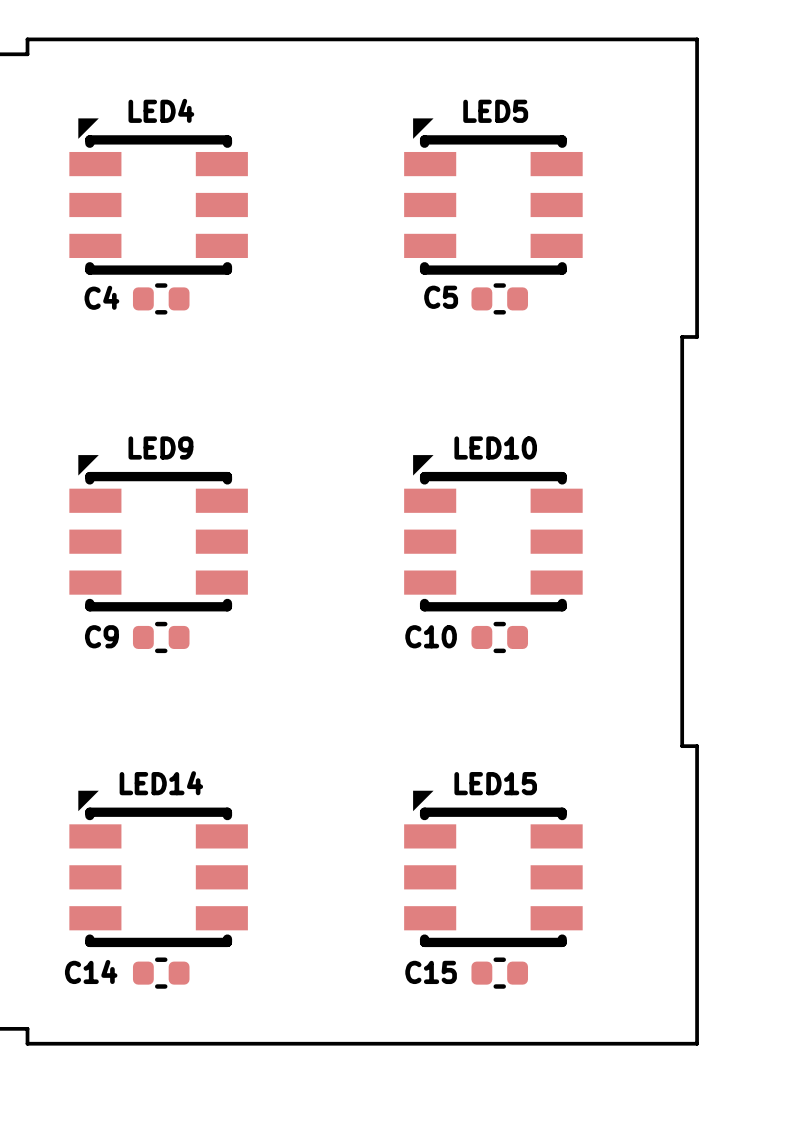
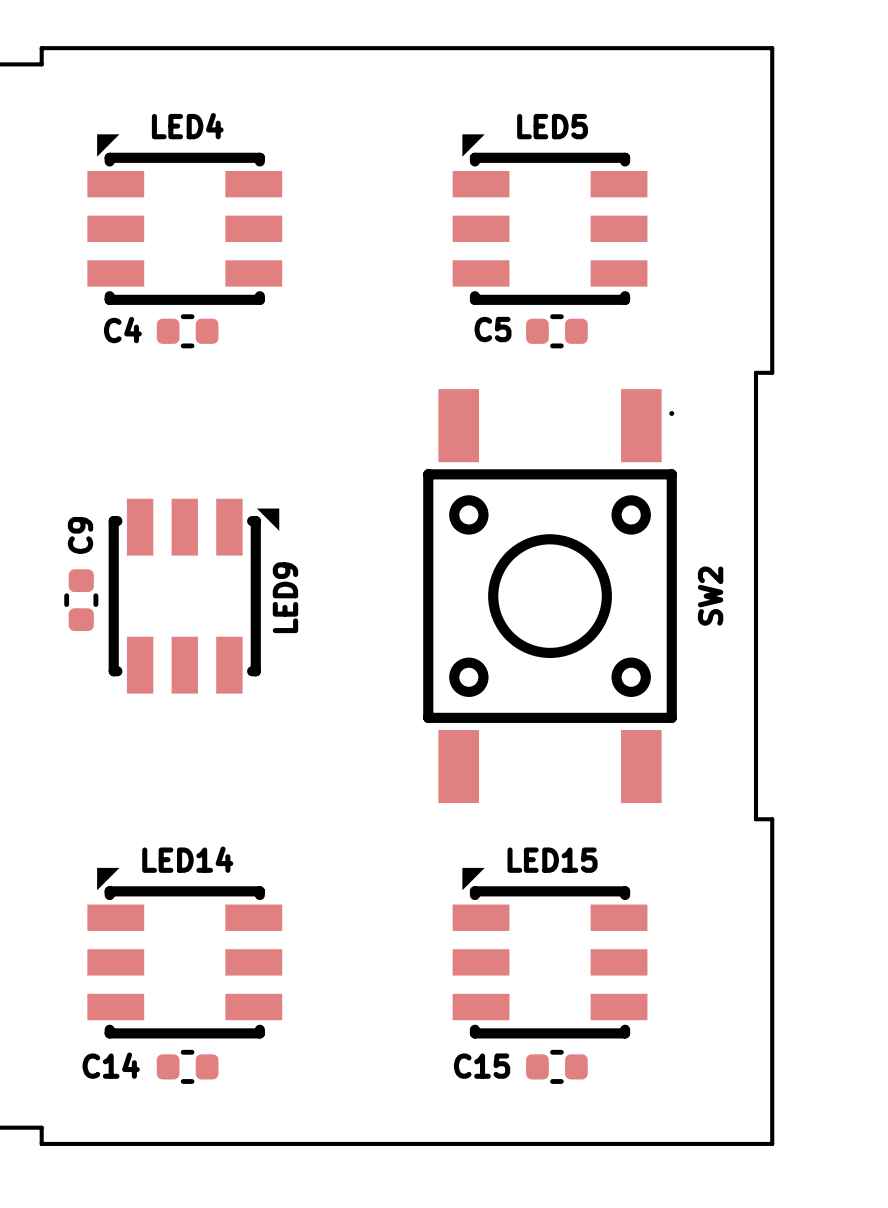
LED9 rotation: 0° (158, 533) -> 90° clockwise (193, 596)
LED10: (493, 533) -> none
SW2: none -> (550, 596)
C9 rotation: 0° (161, 637) -> 90° clockwise (81, 600)
C9 position: (161, 637) -> (81, 600)
C10: (499, 637) -> none

